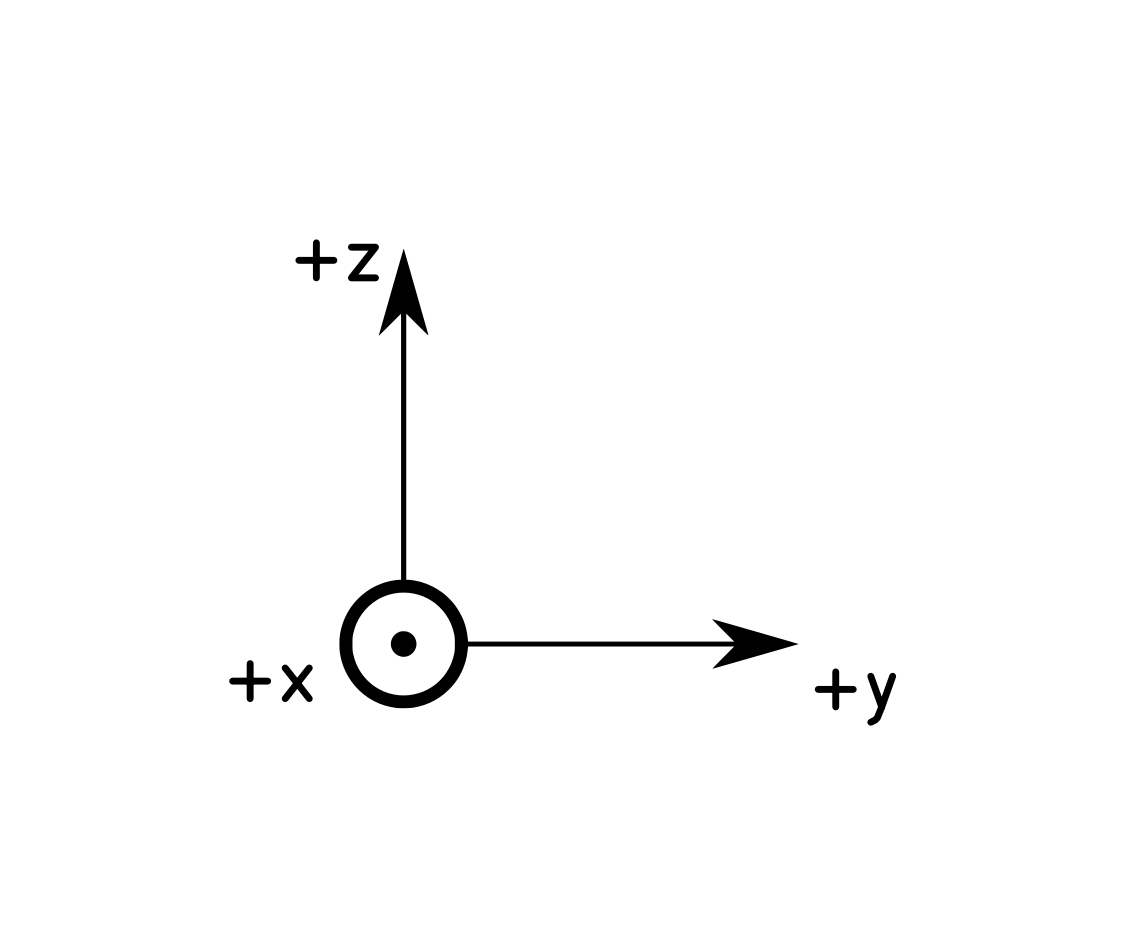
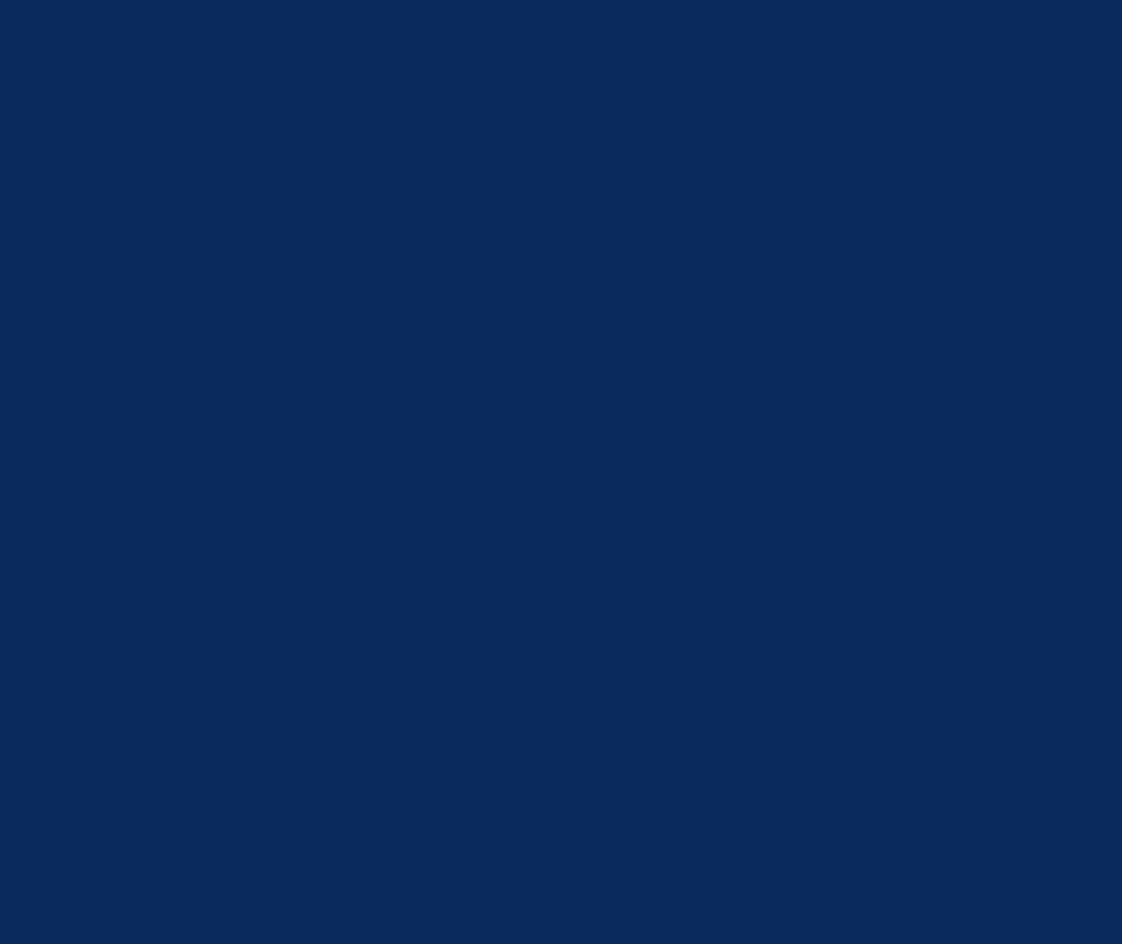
drawing: [339, 248, 799, 709] -> none
text: +z (337, 260) -> none
text: +x (270, 681) -> none
text: +y (855, 697) -> none

